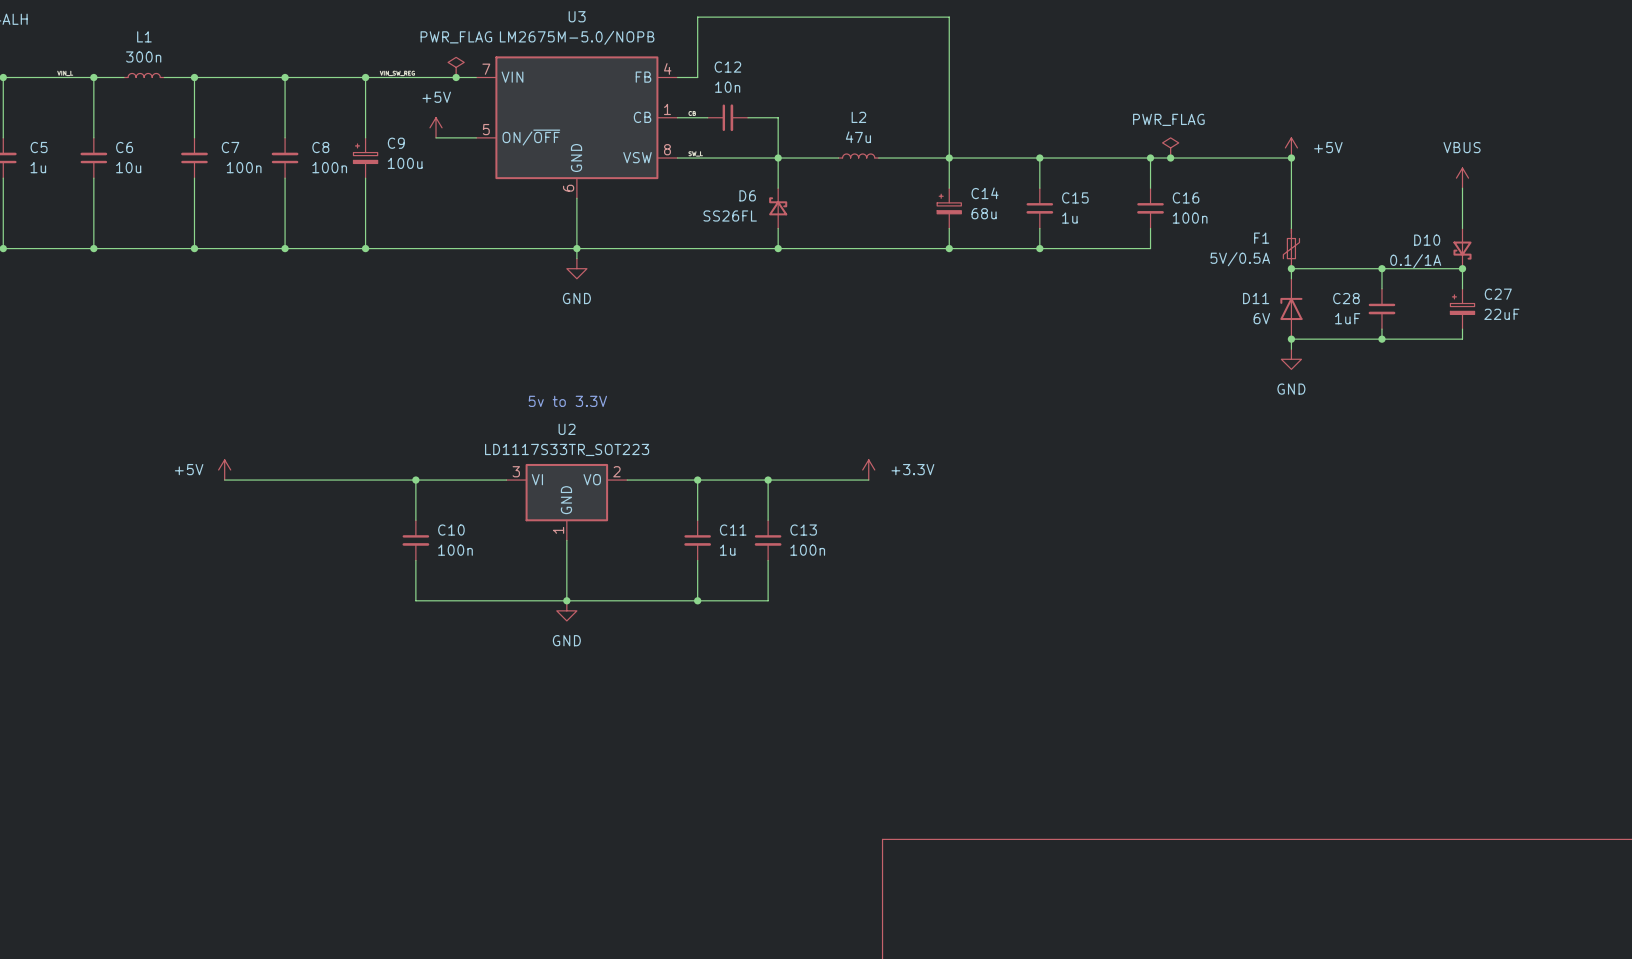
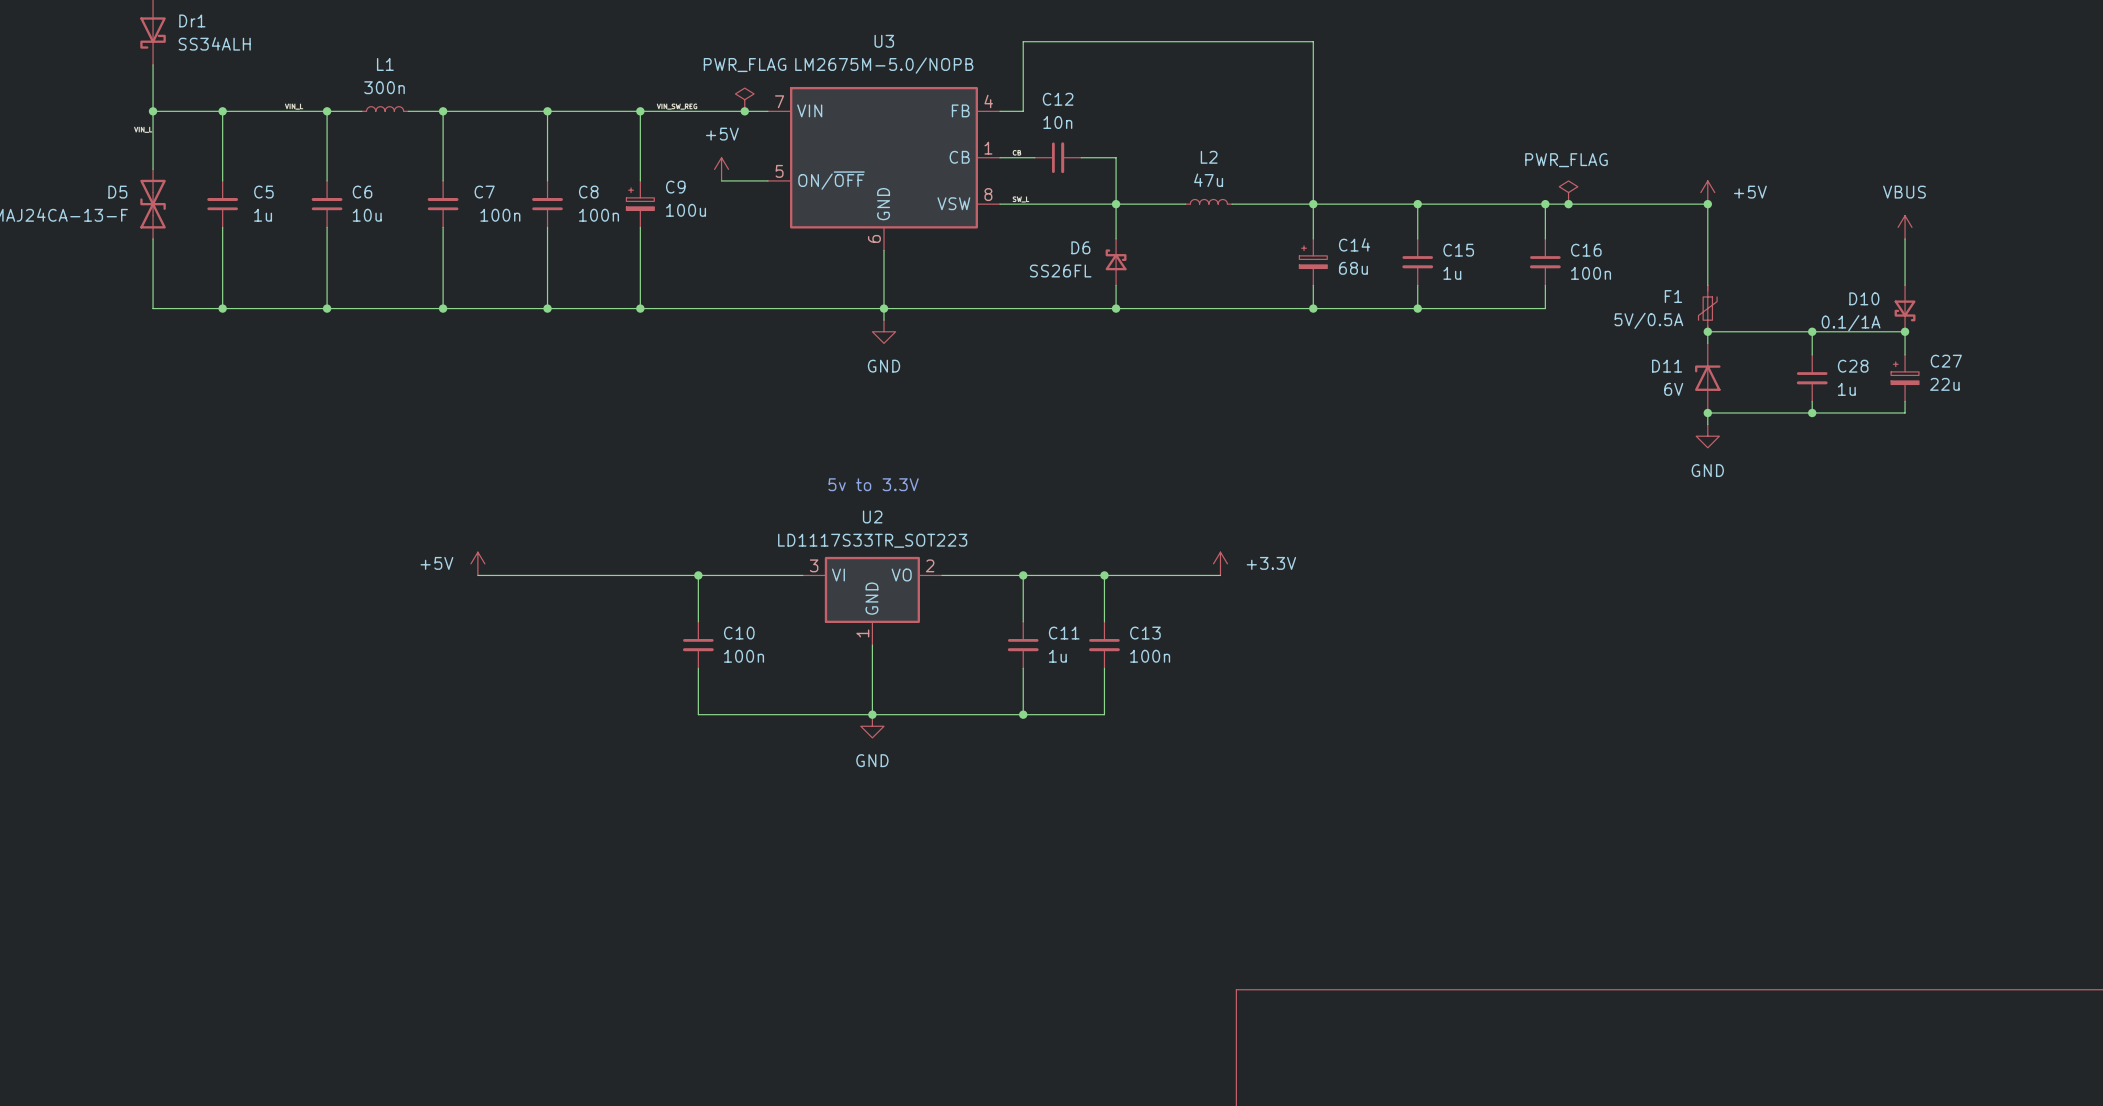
C28 name position: C28 (1346, 298) -> C28 (1853, 366)
C27 value: 22uF (1501, 314) -> 22u (1944, 384)
C28 value: 1uF (1347, 318) -> 1u (1846, 389)

